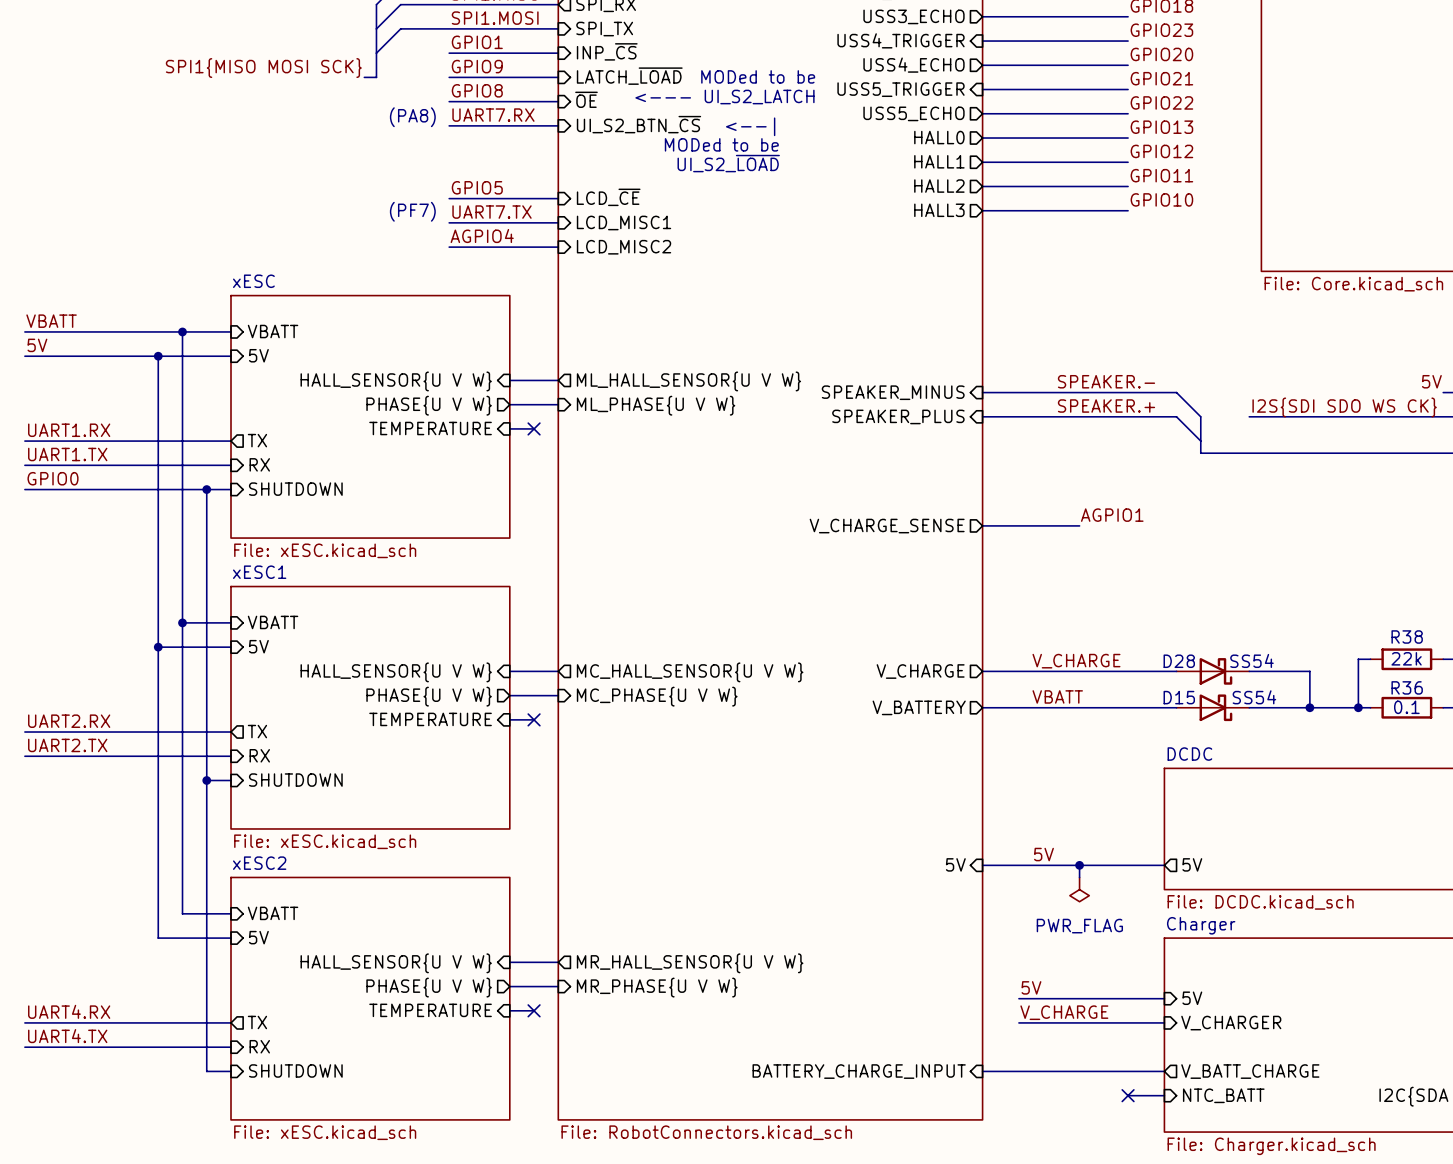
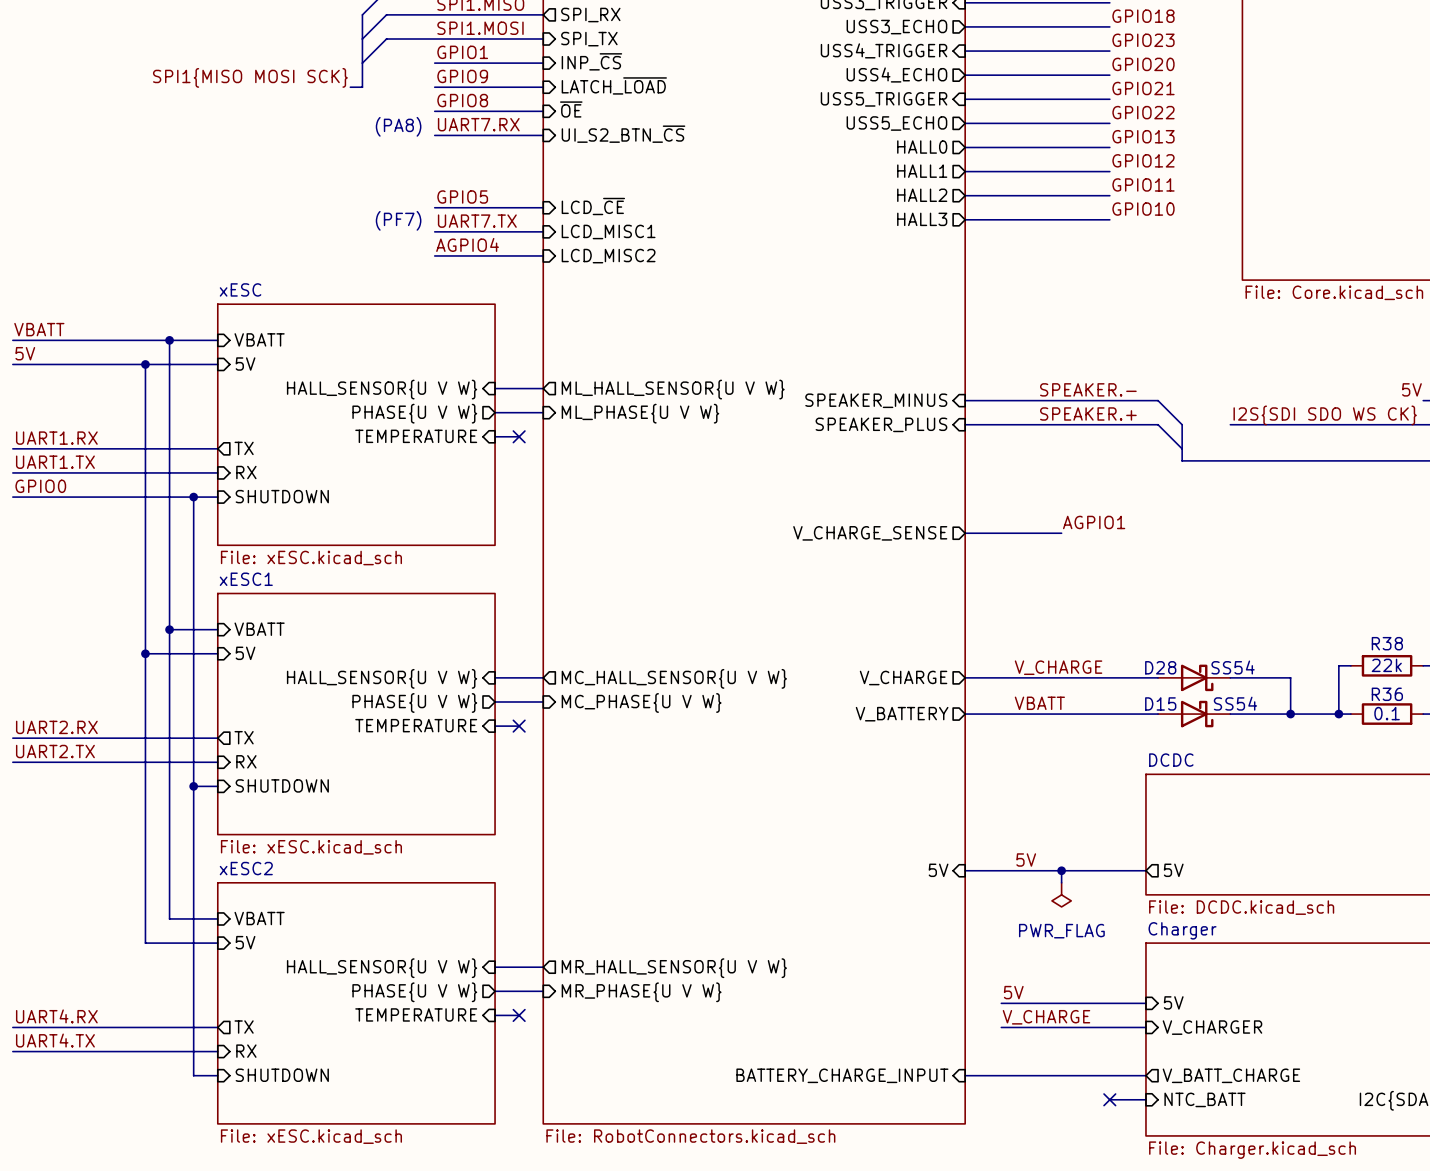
text: MODed to be (758, 76) -> none
text: <--- UI_S2_LATCH (724, 97) -> none
text: <--| (750, 126) -> none
text: MODed to be (721, 144) -> none
text: UI_S2_~{LOAD} (728, 163) -> none

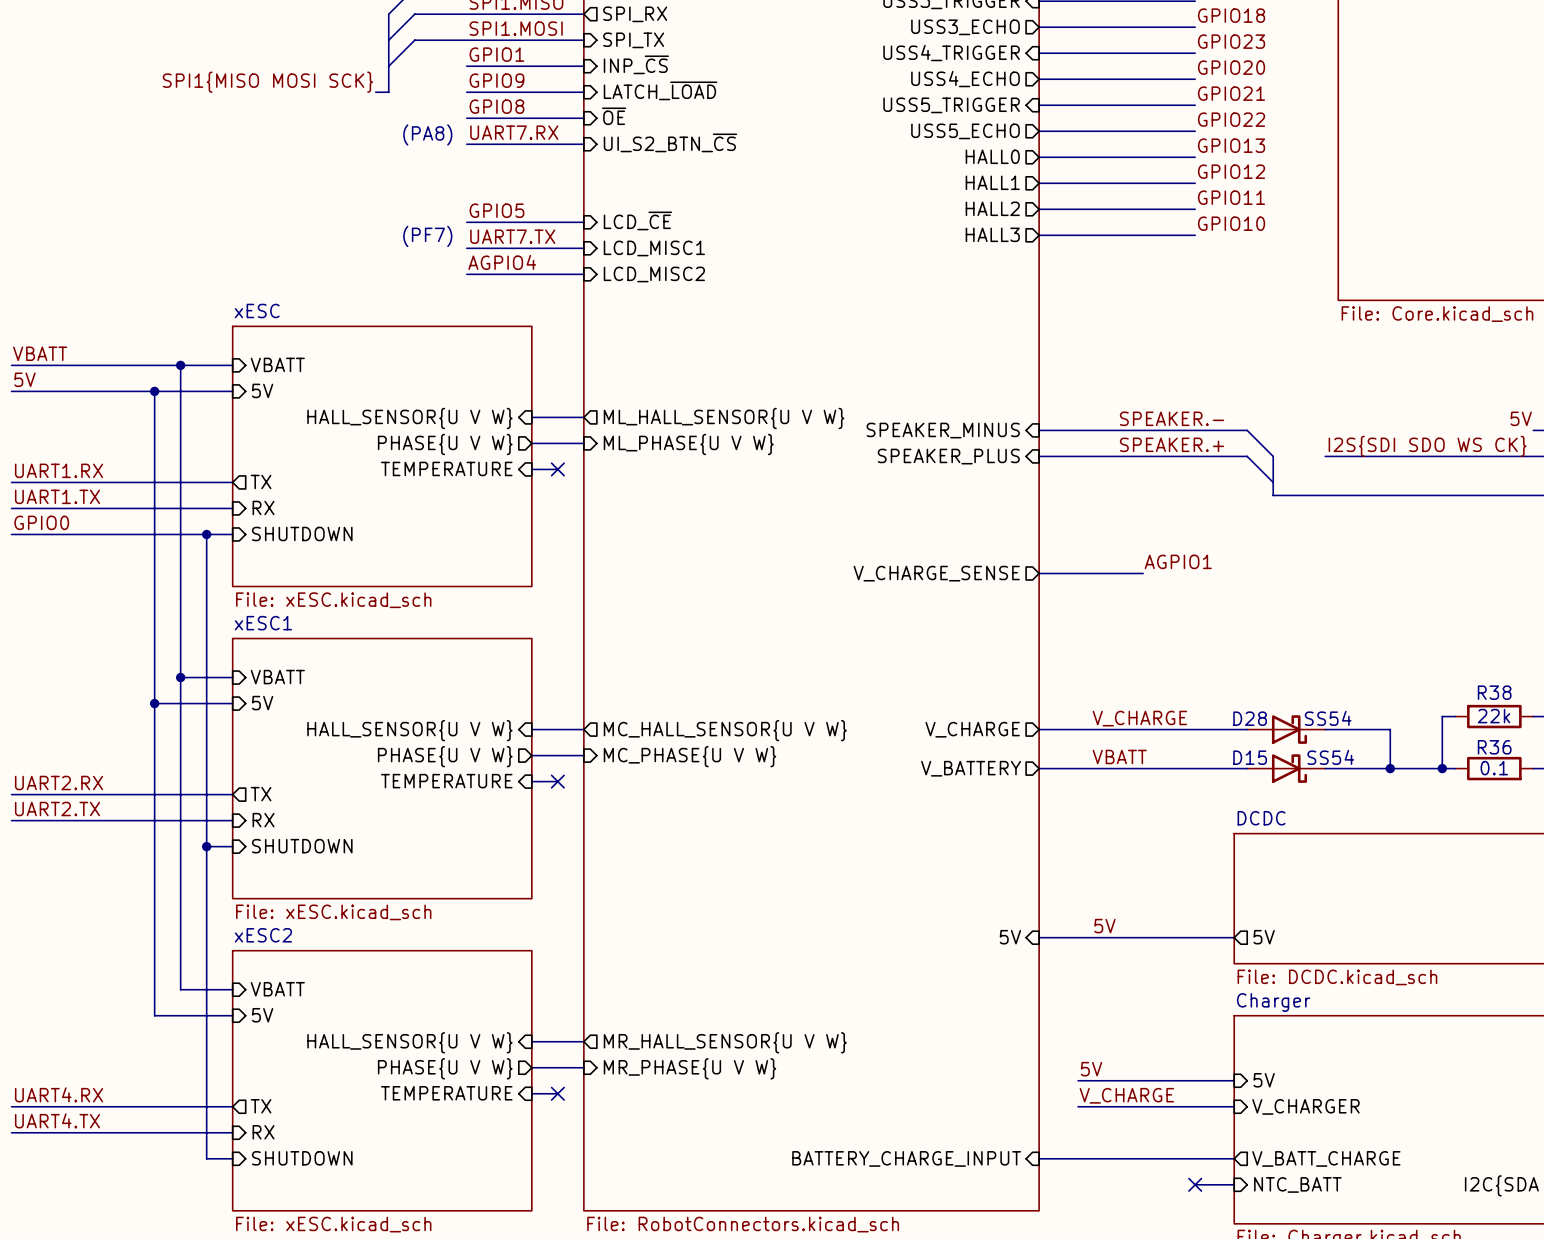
wire: (1061, 870) (1061, 882) -> none
junction: (1061, 870) -> none
power symbol: PWR_FLAG (1061, 894) -> none

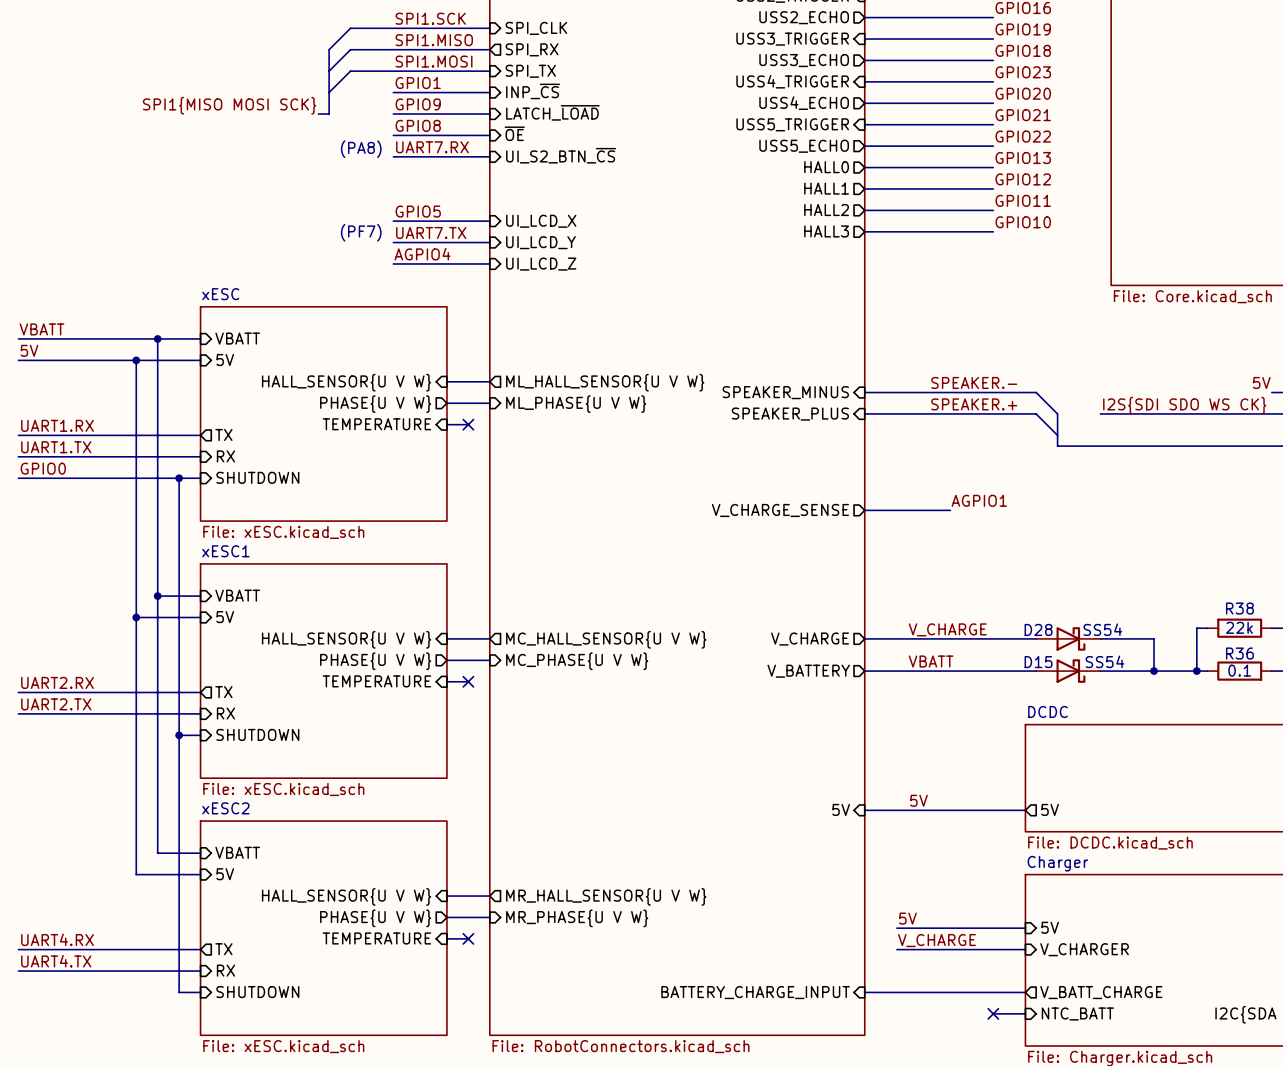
sheet pin: LCD_~{CE} (637, 220) -> UI_LCD_X (541, 221)
sheet pin: LCD_MISC1 (654, 248) -> UI_LCD_Y (540, 242)
sheet pin: LCD_MISC2 (654, 274) -> UI_LCD_Z (541, 264)

